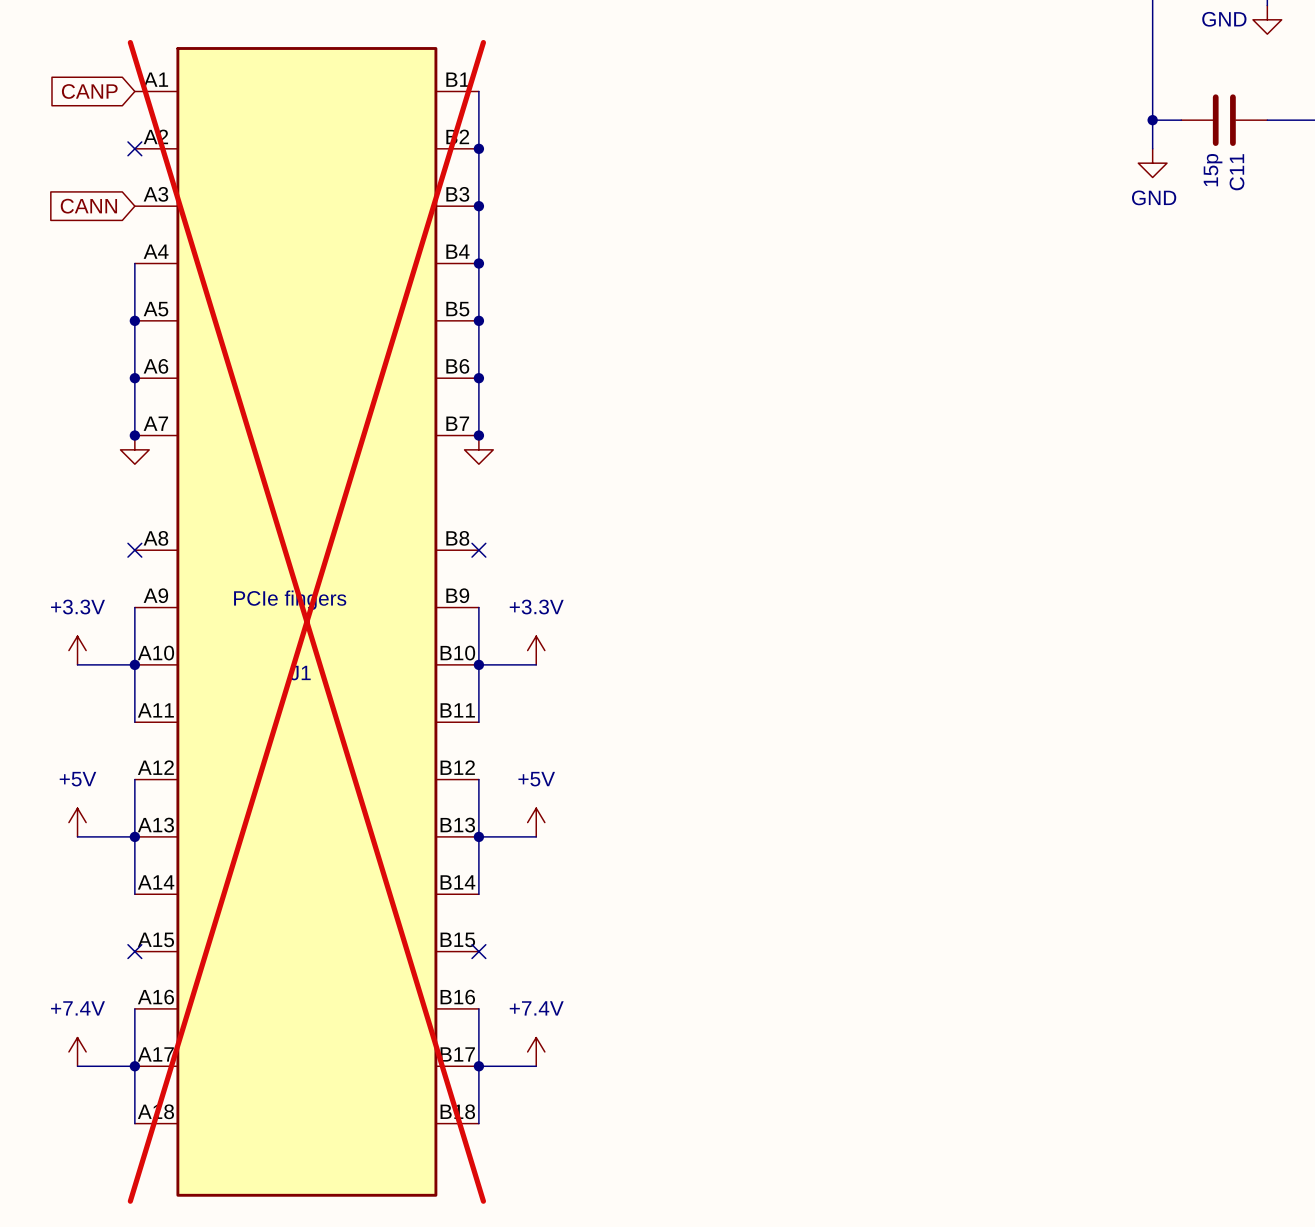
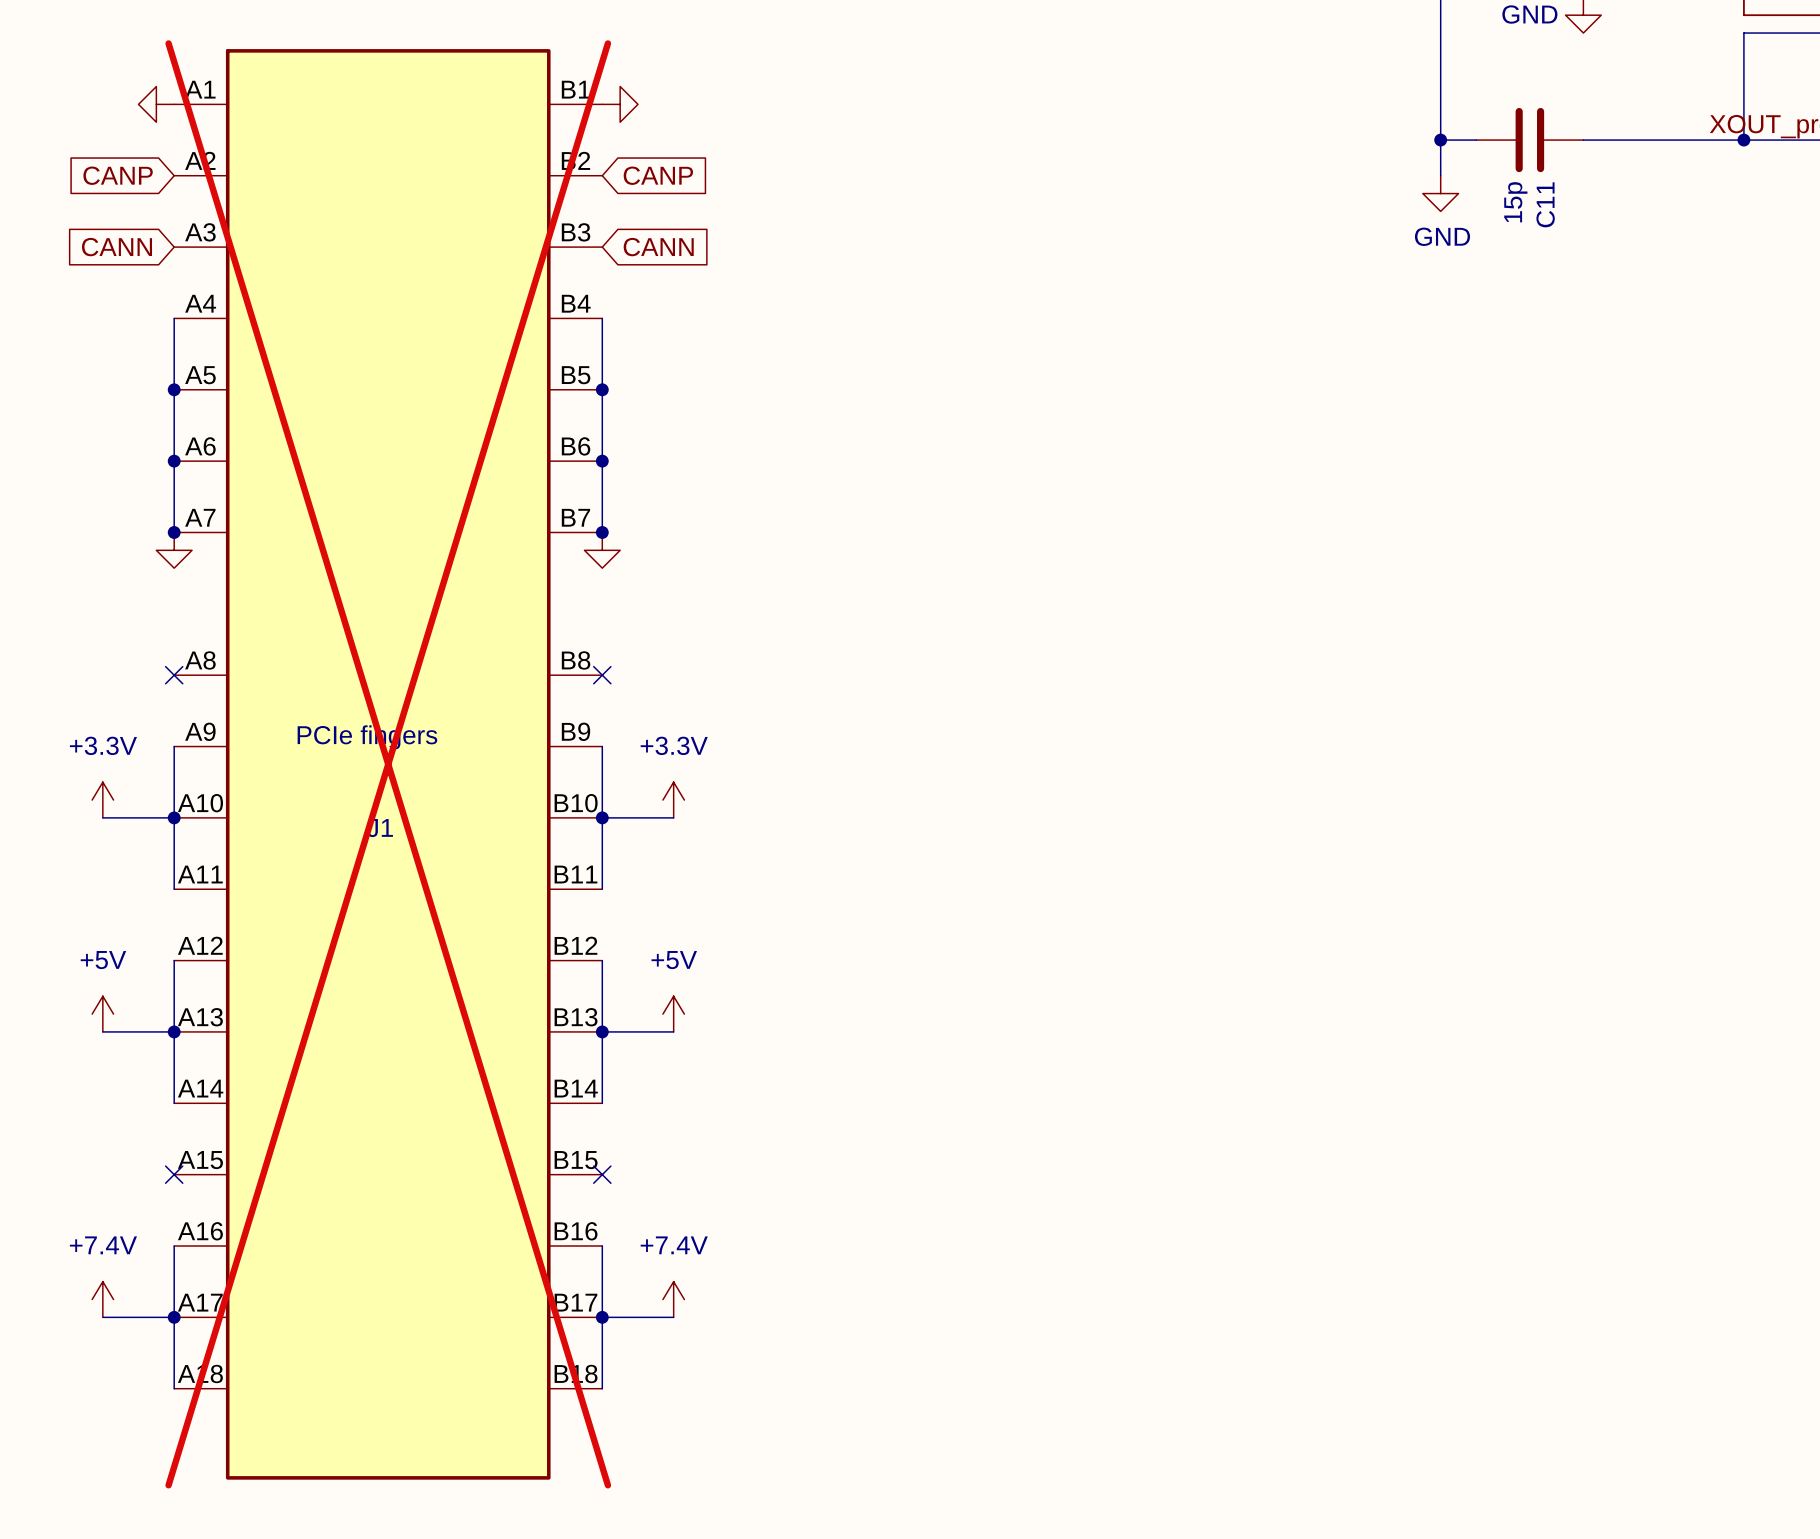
global label position: CANP (89, 91) -> CANP (118, 175)
power symbol: none -> (156, 104)
wire: (478, 91) (478, 263) -> none
power symbol: none -> (620, 104)
no-connect mark: (134, 148) -> none
junction: (478, 148) -> none
global label: none -> CANP (658, 175)
junction: (478, 206) -> none
global label: none -> CANN (658, 247)
junction: (478, 263) -> none

